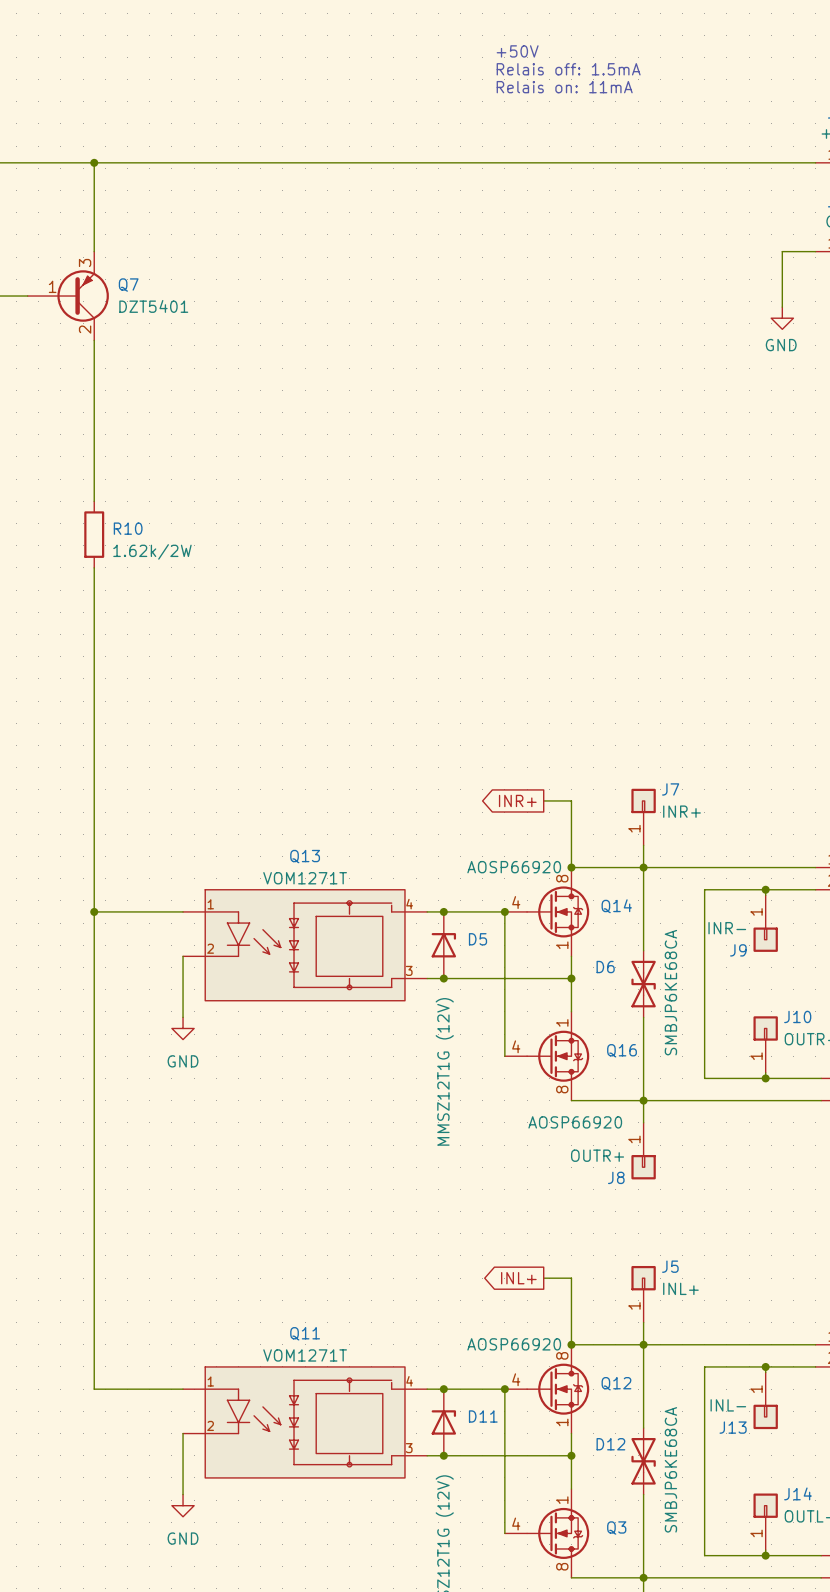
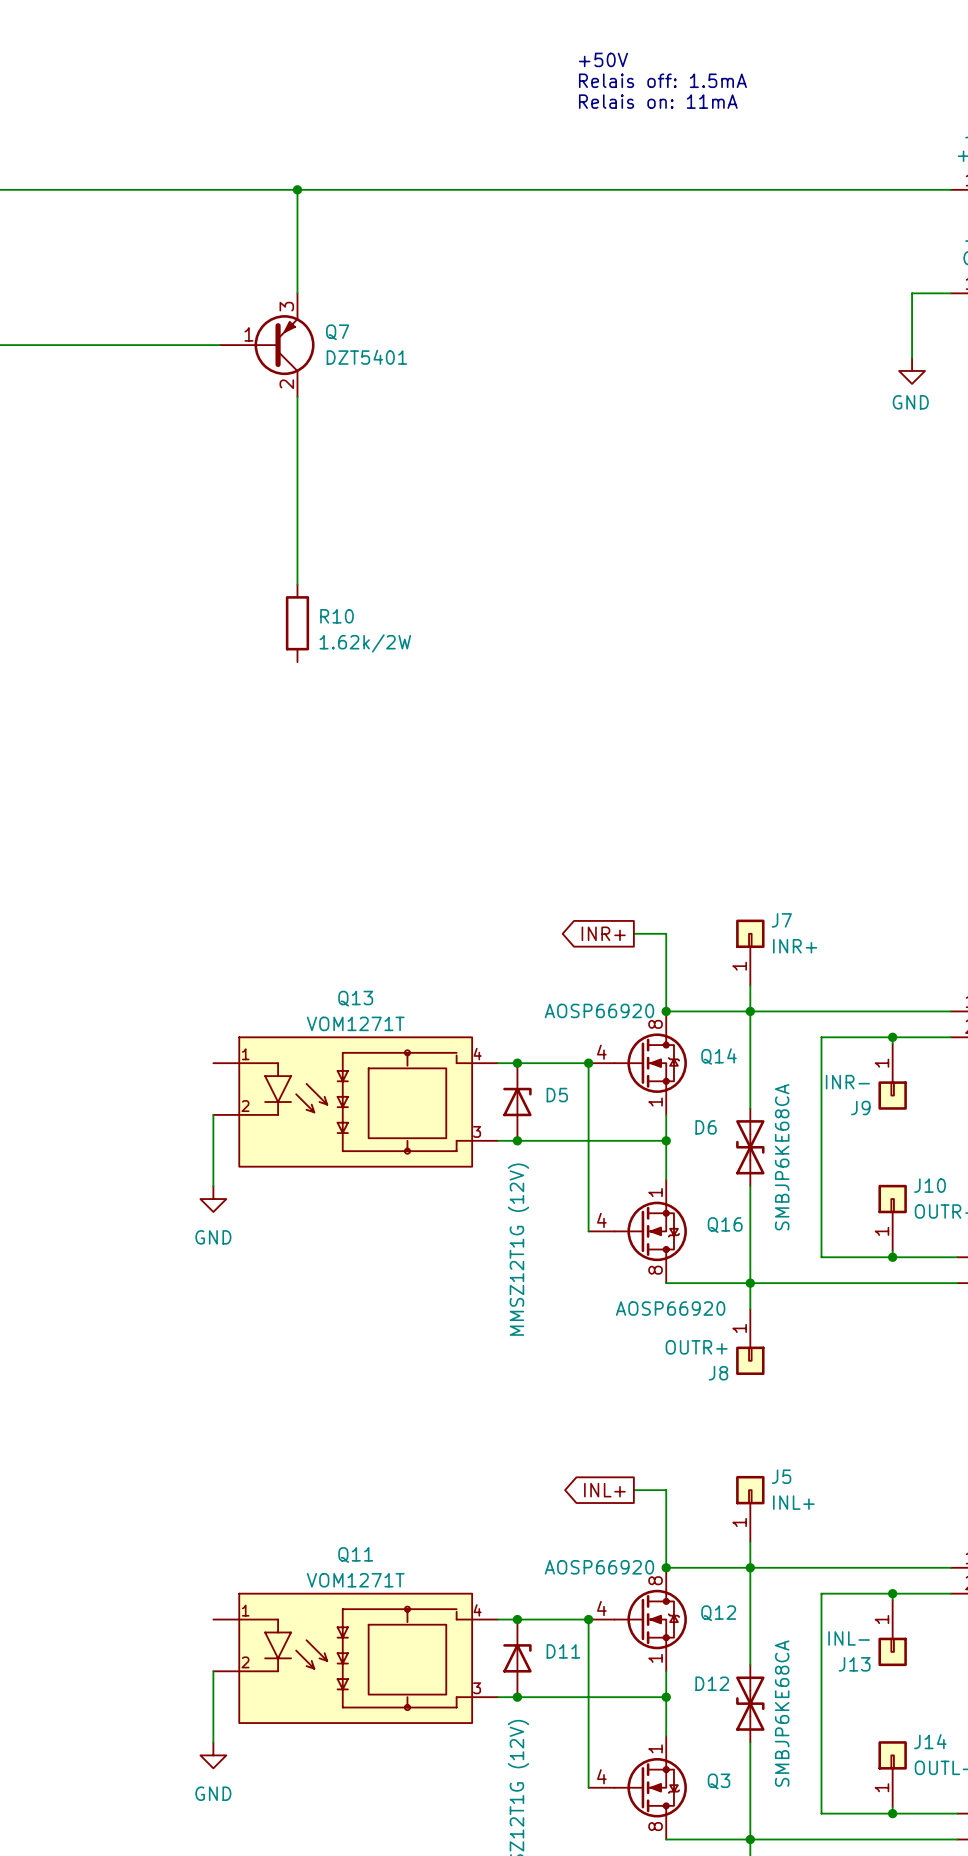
wire: (94, 162) (94, 251) -> (297, 189) (297, 293)
junction: (94, 162) -> none
junction: none -> (297, 189)
wire: none -> (32, 345) (219, 345)
Q7 position: (68, 296) -> (267, 345)
wire: (94, 340) (94, 501) -> (297, 396) (297, 584)
R10 position: (94, 534) -> (297, 623)
wire: (94, 567) (94, 1389) (183, 1389) -> none
wire: (94, 911) (183, 911) -> none
junction: (94, 911) -> none

